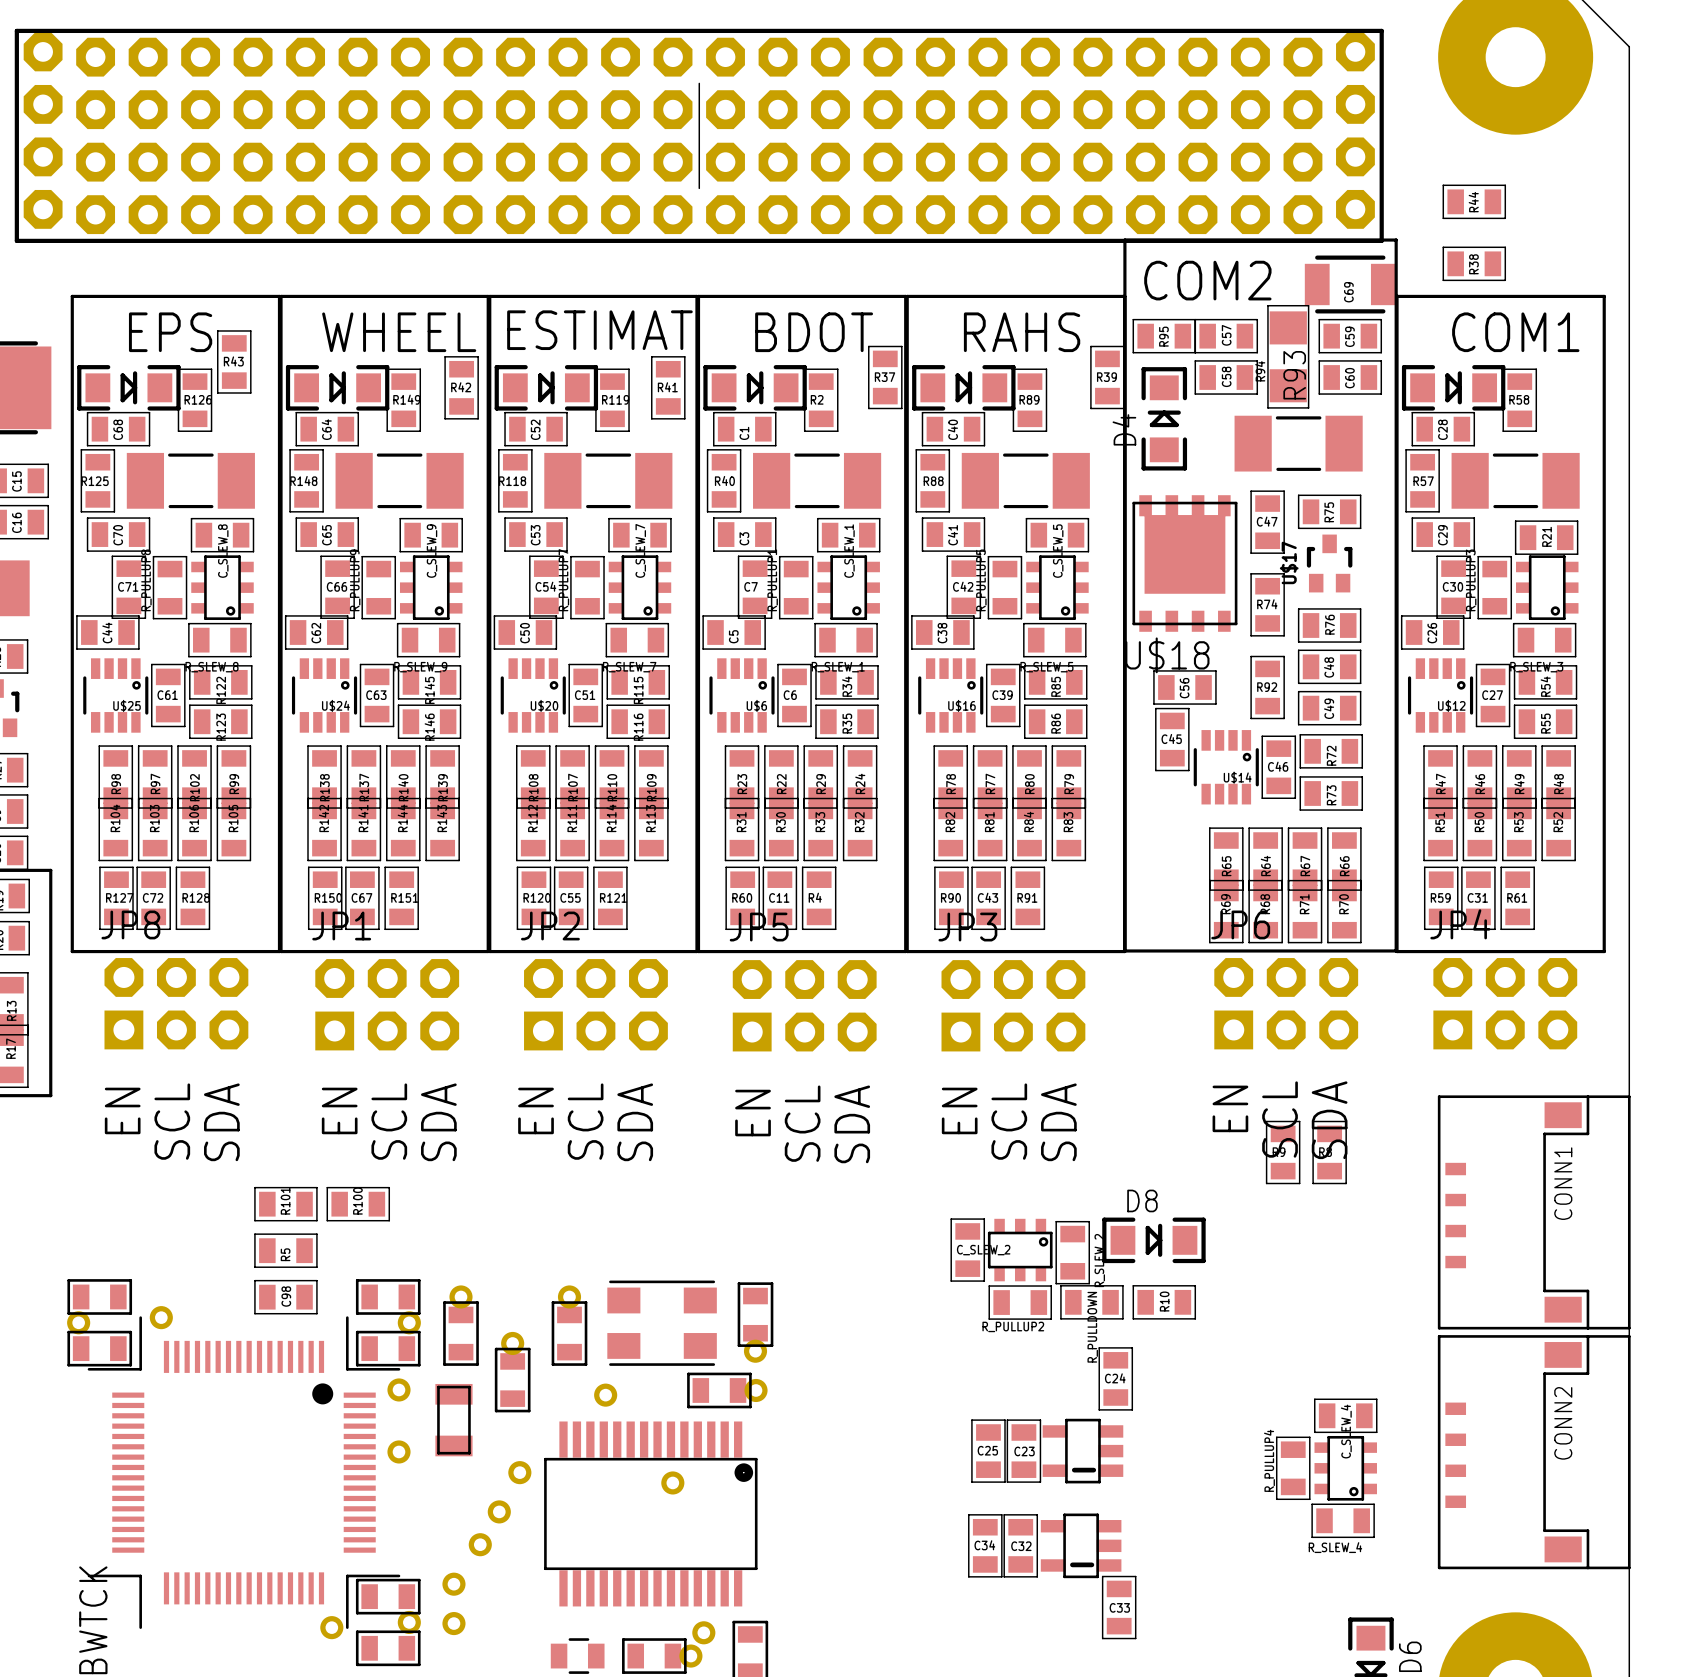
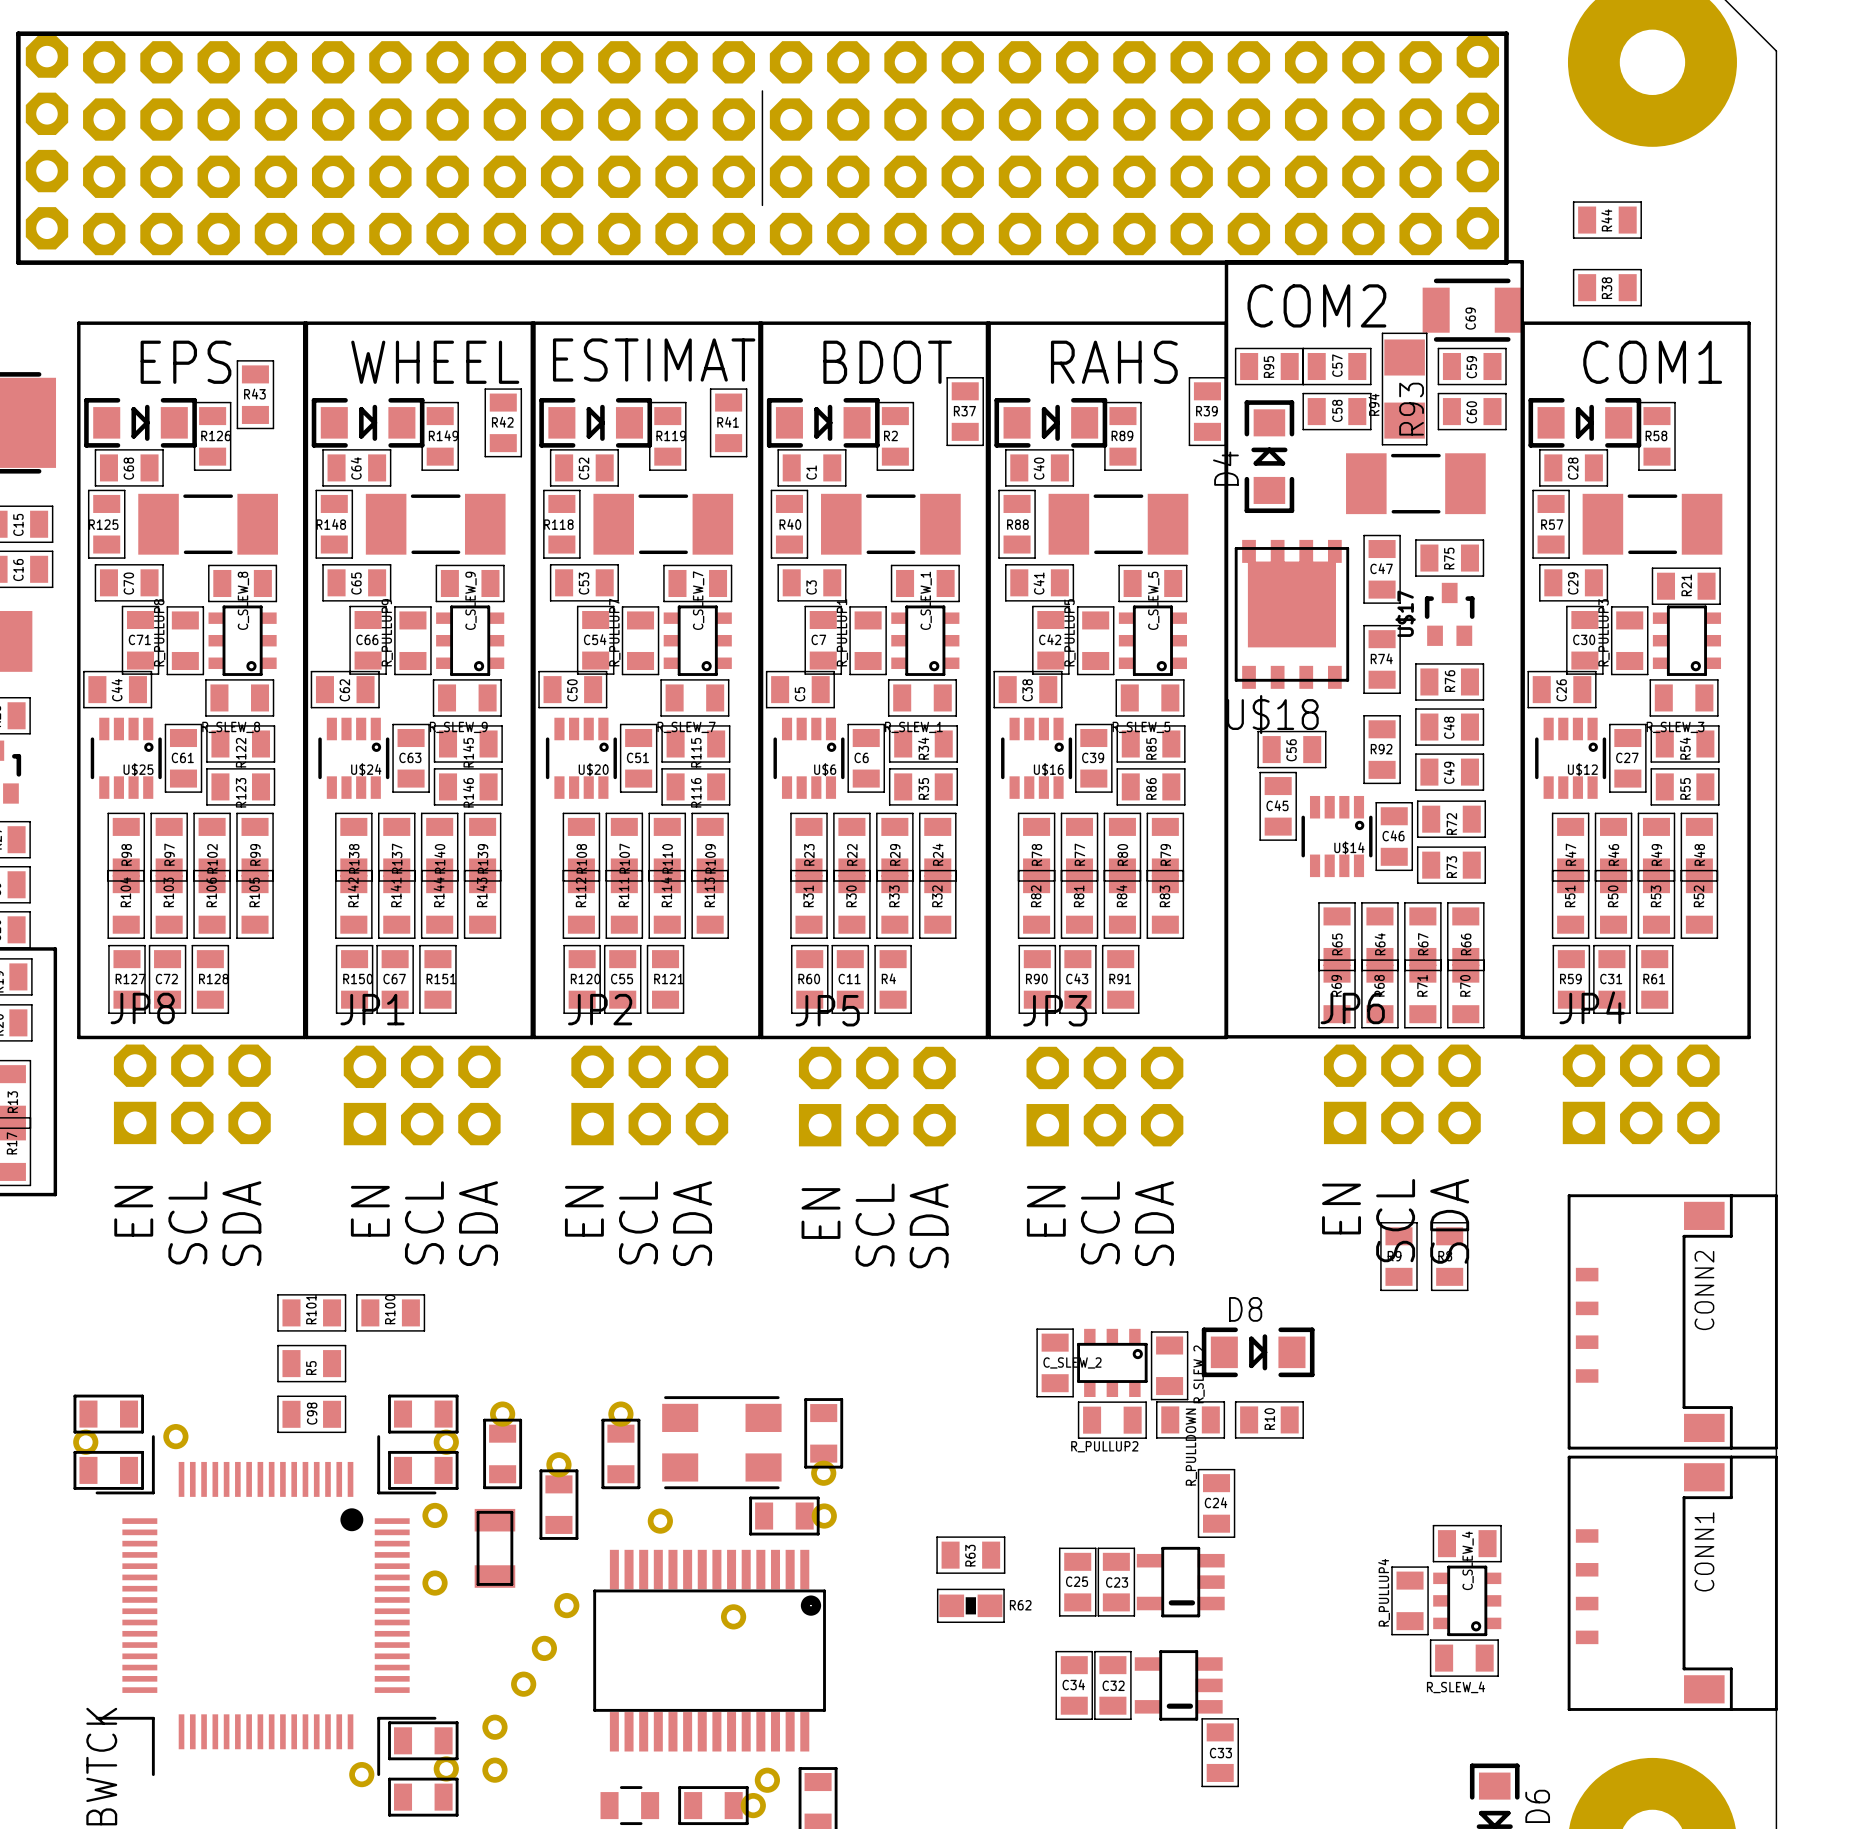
CONN1 name: CONN1 (1563, 1183) -> CONN2 (1704, 1290)
CONN2 name: CONN2 (1563, 1423) -> CONN1 (1704, 1551)
R63: none -> (970, 1555)
R62: none -> (970, 1605)

